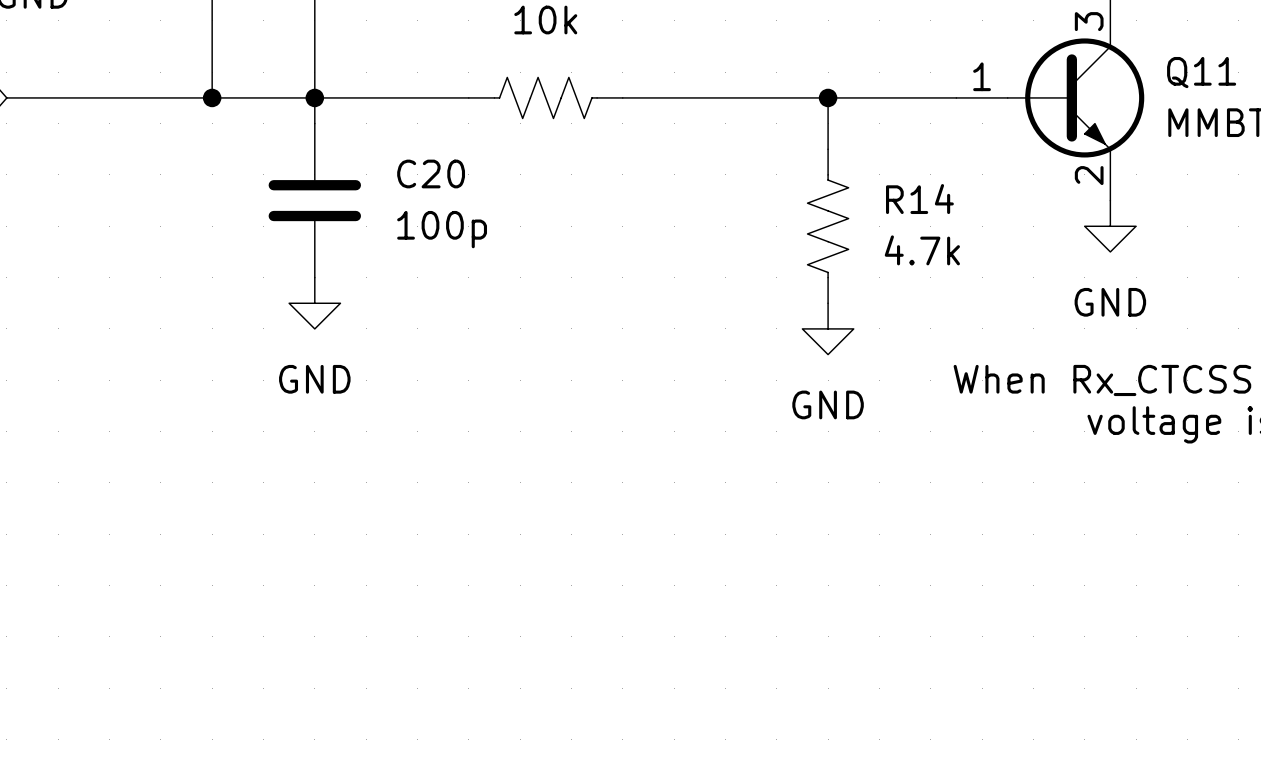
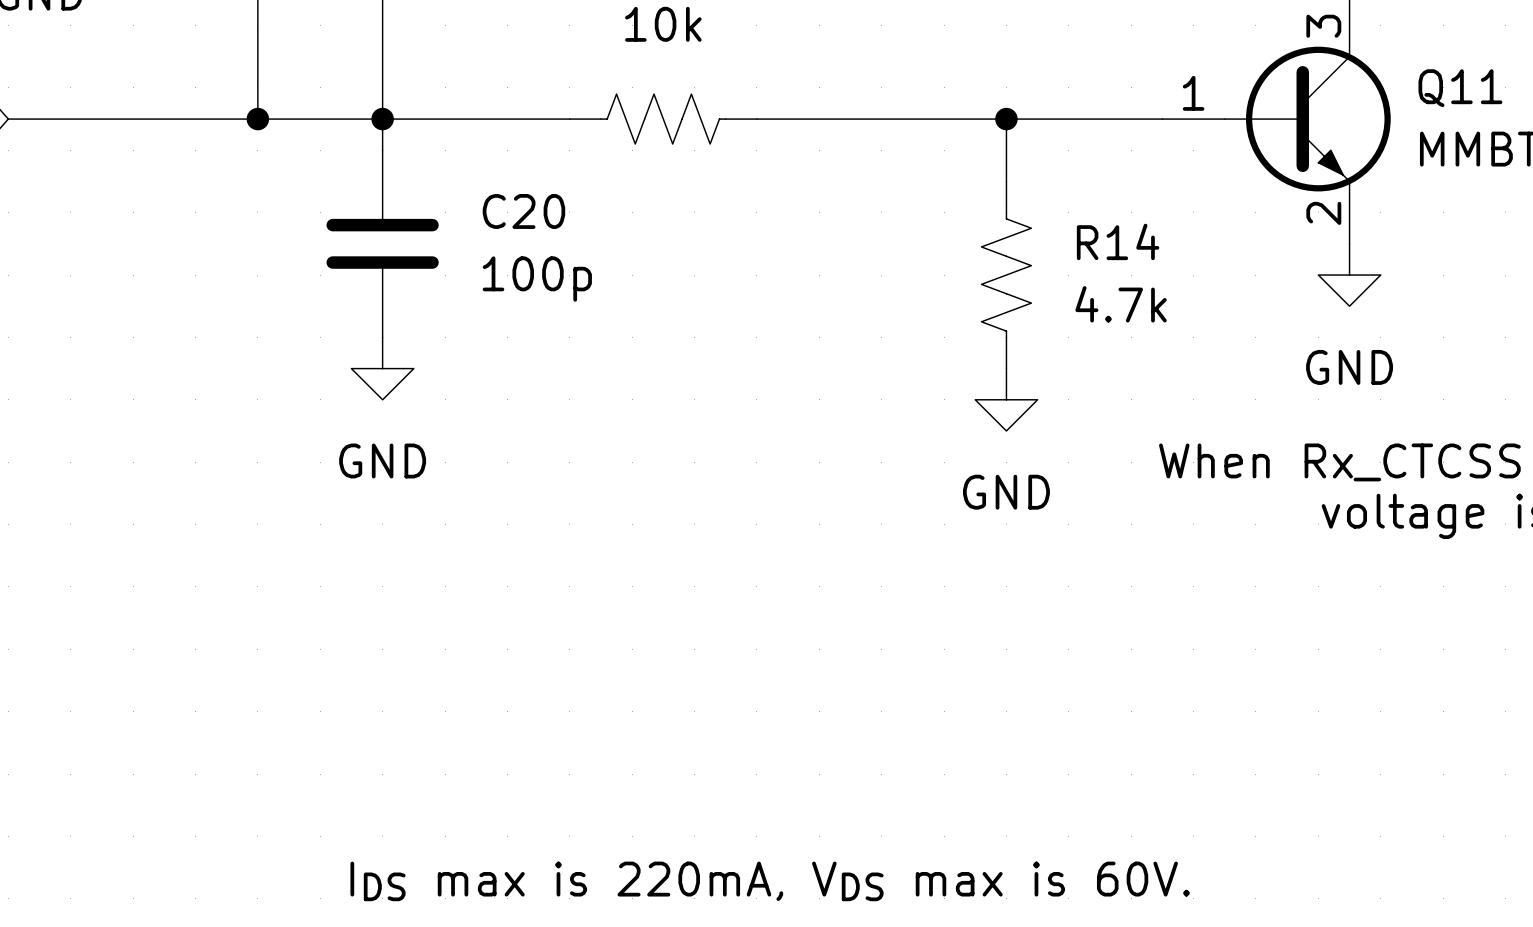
text: none -> IDS max is 220mA, VDS max is 60V. (770, 881)

